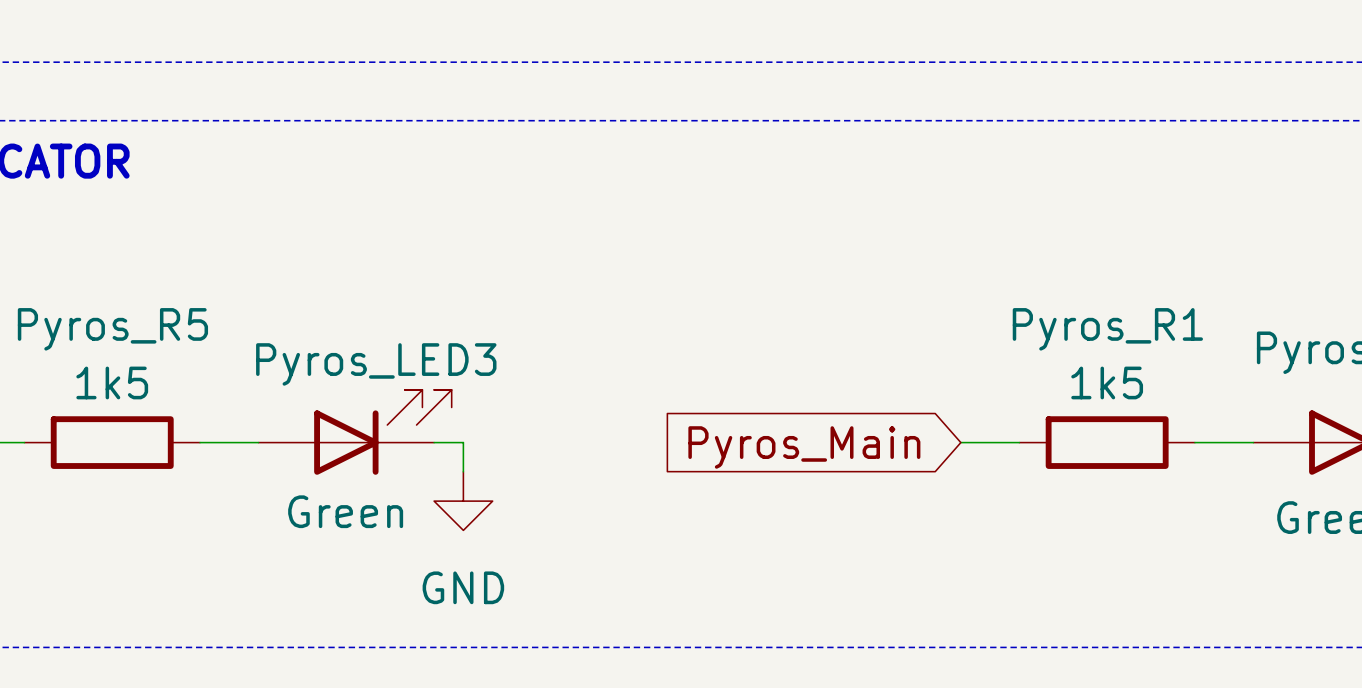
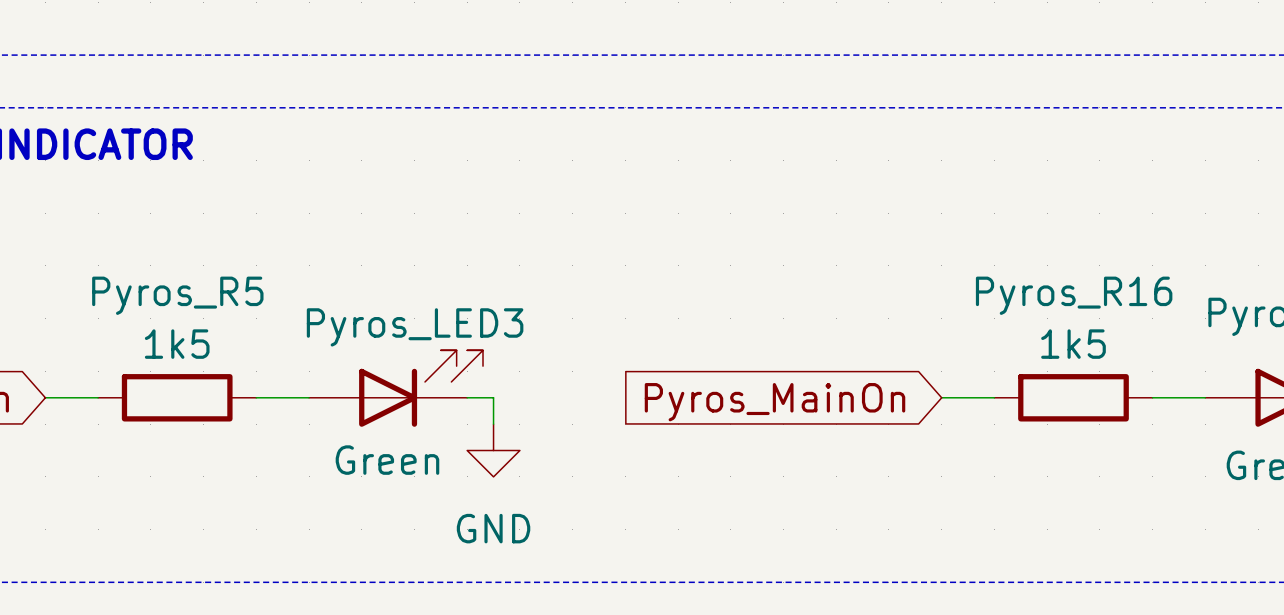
Pyros_R1 name: Pyros_R1 (1107, 329) -> Pyros_R16 (1074, 295)
global label: Pyros_Main (804, 447) -> Pyros_MainOn (775, 402)

